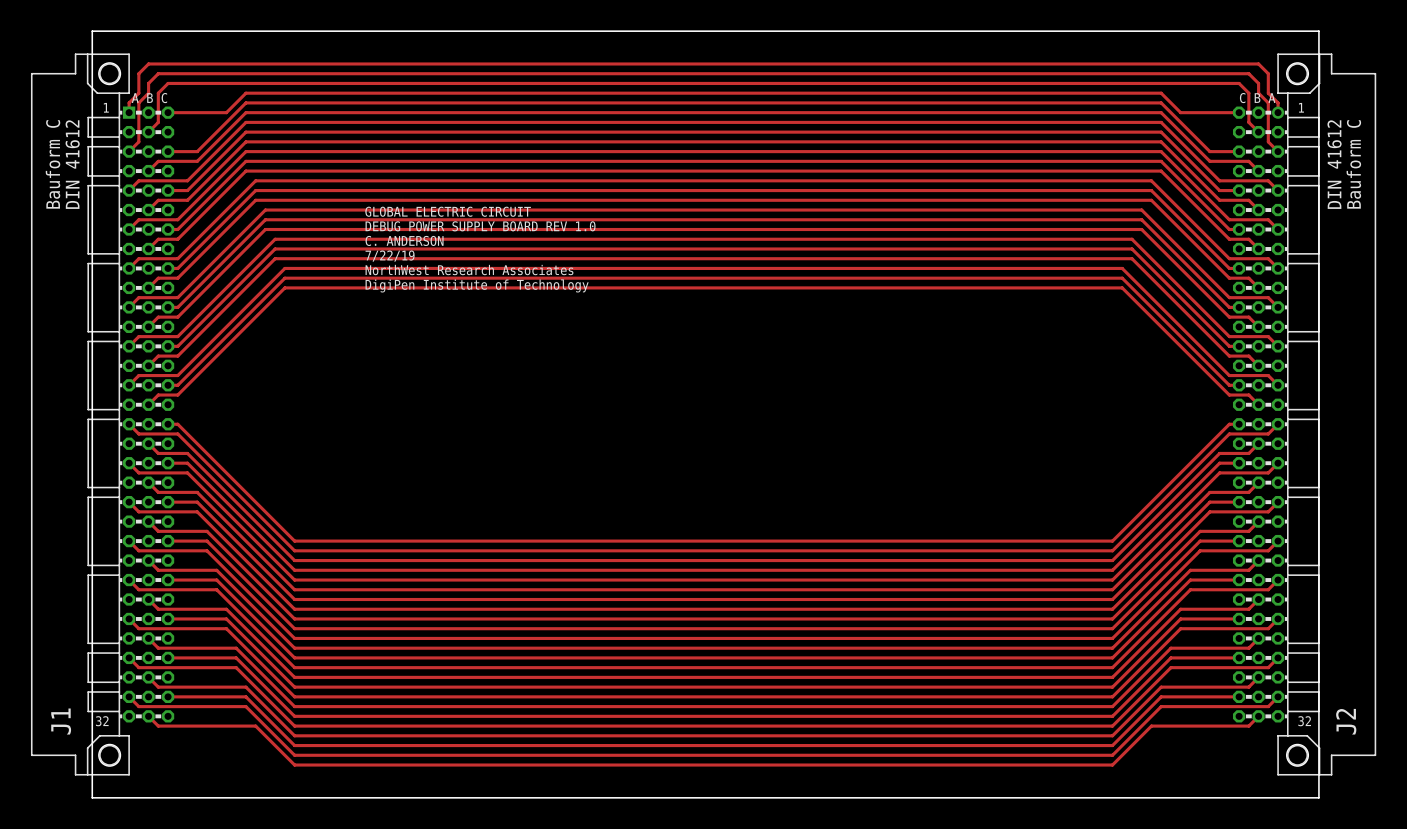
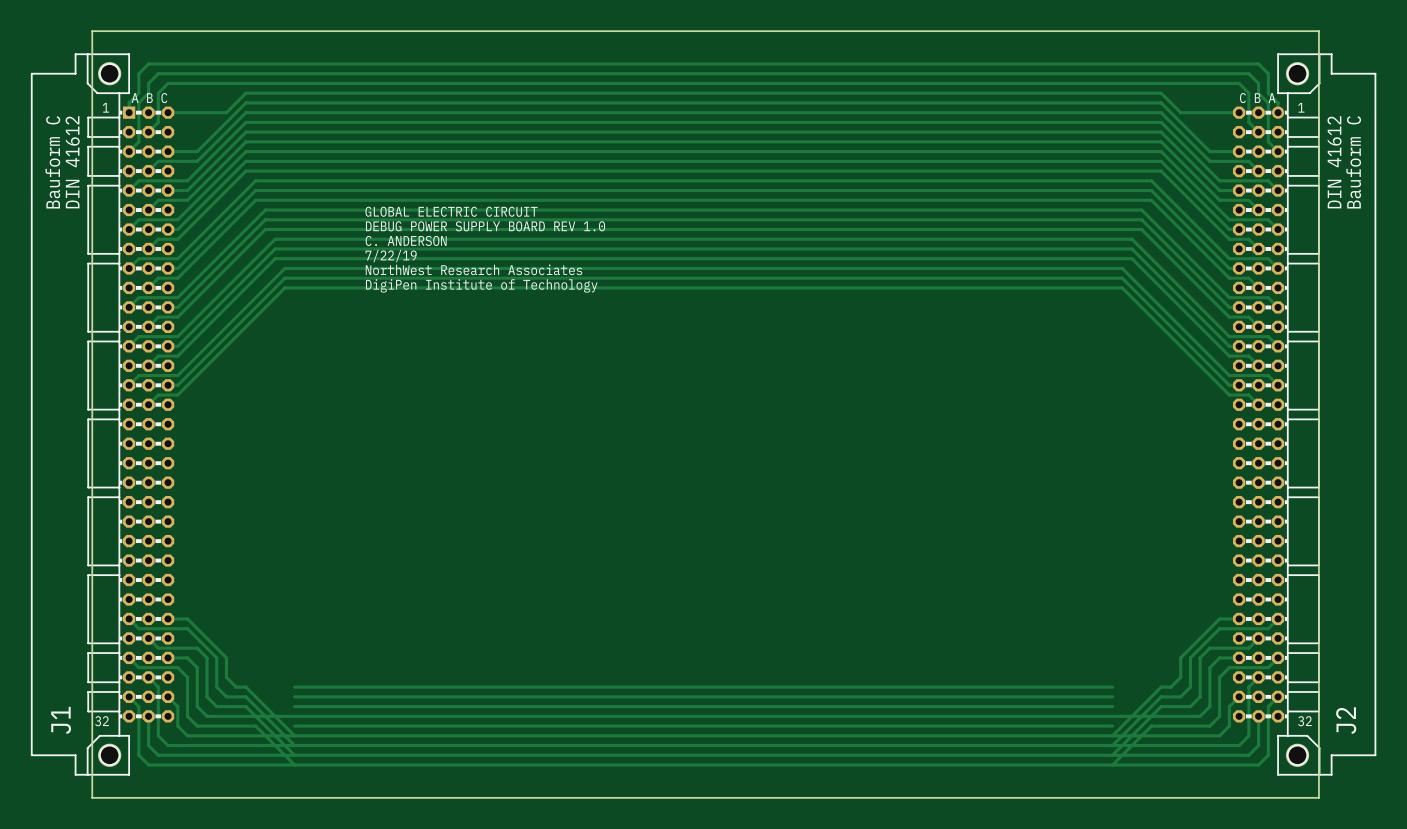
track: (129, 424) (138, 433) (177, 433) (294, 550) (1112, 550) (1229, 433) (1268, 433) (1278, 424) -> none
track: (168, 424) (177, 424) (294, 541) (1112, 541) (1229, 424) (1239, 424) -> none
track: (148, 443) (158, 453) (187, 453) (294, 560) (1112, 560) (1219, 453) (1248, 453) (1258, 443) -> none
track: (129, 463) (138, 472) (187, 472) (294, 580) (1112, 580) (1219, 472) (1268, 472) (1278, 463) -> none
track: (168, 463) (187, 463) (294, 570) (1112, 570) (1219, 463) (1239, 463) -> none
track: (148, 482) (158, 492) (197, 492) (294, 589) (1112, 589) (1209, 492) (1248, 492) (1258, 482) -> none
track: (129, 502) (138, 511) (197, 511) (294, 609) (1112, 609) (1209, 511) (1268, 511) (1278, 502) -> none
track: (168, 502) (197, 502) (294, 599) (1112, 599) (1209, 502) (1239, 502) -> none
track: (148, 521) (158, 531) (207, 531) (294, 618) (1112, 618) (1200, 531) (1248, 531) (1258, 521) -> none
track: (129, 541) (138, 550) (207, 550) (294, 638) (1112, 638) (1200, 550) (1268, 550) (1278, 541) -> none
track: (168, 541) (207, 541) (294, 628) (1112, 628) (1200, 541) (1239, 541) -> none
track: (148, 560) (158, 570) (216, 570) (294, 648) (1112, 648) (1190, 570) (1248, 570) (1258, 560) -> none
track: (129, 580) (138, 589) (216, 589) (294, 667) (1112, 667) (1190, 589) (1268, 589) (1278, 580) -> none
track: (168, 580) (216, 580) (294, 657) (1112, 657) (1190, 580) (1239, 580) -> none
track: (148, 599) (158, 609) (226, 609) (294, 677) (1112, 677) (1180, 609) (1248, 609) (1258, 599) -> none
track: (187, 618) (226, 618) (294, 687) -> (187, 618) (226, 657) (226, 677) (236, 687)
track: (1219, 618) (1180, 618) (1112, 687) -> (1219, 618) (1180, 657) (1180, 677) (1170, 687)
track: (187, 628) (226, 628) (294, 696) -> (187, 628) (216, 657) (216, 687) (226, 696)
track: (1219, 628) (1180, 628) (1112, 696) -> (1219, 628) (1190, 657) (1190, 687) (1180, 696)
track: (197, 648) (236, 648) (294, 706) -> (197, 648) (207, 657) (207, 696) (216, 706)
track: (1209, 648) (1170, 648) (1112, 706) -> (1209, 648) (1200, 657) (1200, 696) (1190, 706)
track: (187, 657) (236, 657) (294, 716) -> (187, 657) (197, 667) (197, 706) (207, 716) (294, 716)
track: (1219, 657) (1170, 657) (1112, 716) -> (1219, 657) (1209, 667) (1209, 706) (1200, 716) (1112, 716)
track: (177, 667) (236, 667) (294, 726) -> none
track: (1229, 667) (1170, 667) (1112, 726) -> none
track: (158, 687) (236, 687) -> (158, 687) (158, 735) (168, 745) (294, 745)
track: (1170, 687) (1248, 687) -> (1112, 745) (1239, 745) (1248, 735) (1248, 687)
track: (168, 696) (226, 696) -> (168, 696) (177, 706) (177, 726) (187, 735) (294, 735)
track: (1180, 696) (1239, 696) -> (1112, 735) (1219, 735) (1229, 726) (1229, 706) (1239, 696)
track: (138, 706) (216, 706) -> (138, 706) (138, 755) (148, 765) (294, 765)
track: (1190, 706) (1268, 706) -> (1112, 765) (1258, 765) (1268, 755) (1268, 706)
track: (148, 716) (158, 726) (197, 726) -> (177, 667) (187, 677) (187, 716) (197, 726)
track: none -> (148, 716) (148, 745) (158, 755) (294, 755)
track: (1258, 716) (1248, 726) (1209, 726) -> (1229, 667) (1219, 677) (1219, 716) (1209, 726)
track: none -> (1258, 716) (1258, 745) (1248, 755) (1112, 755)

